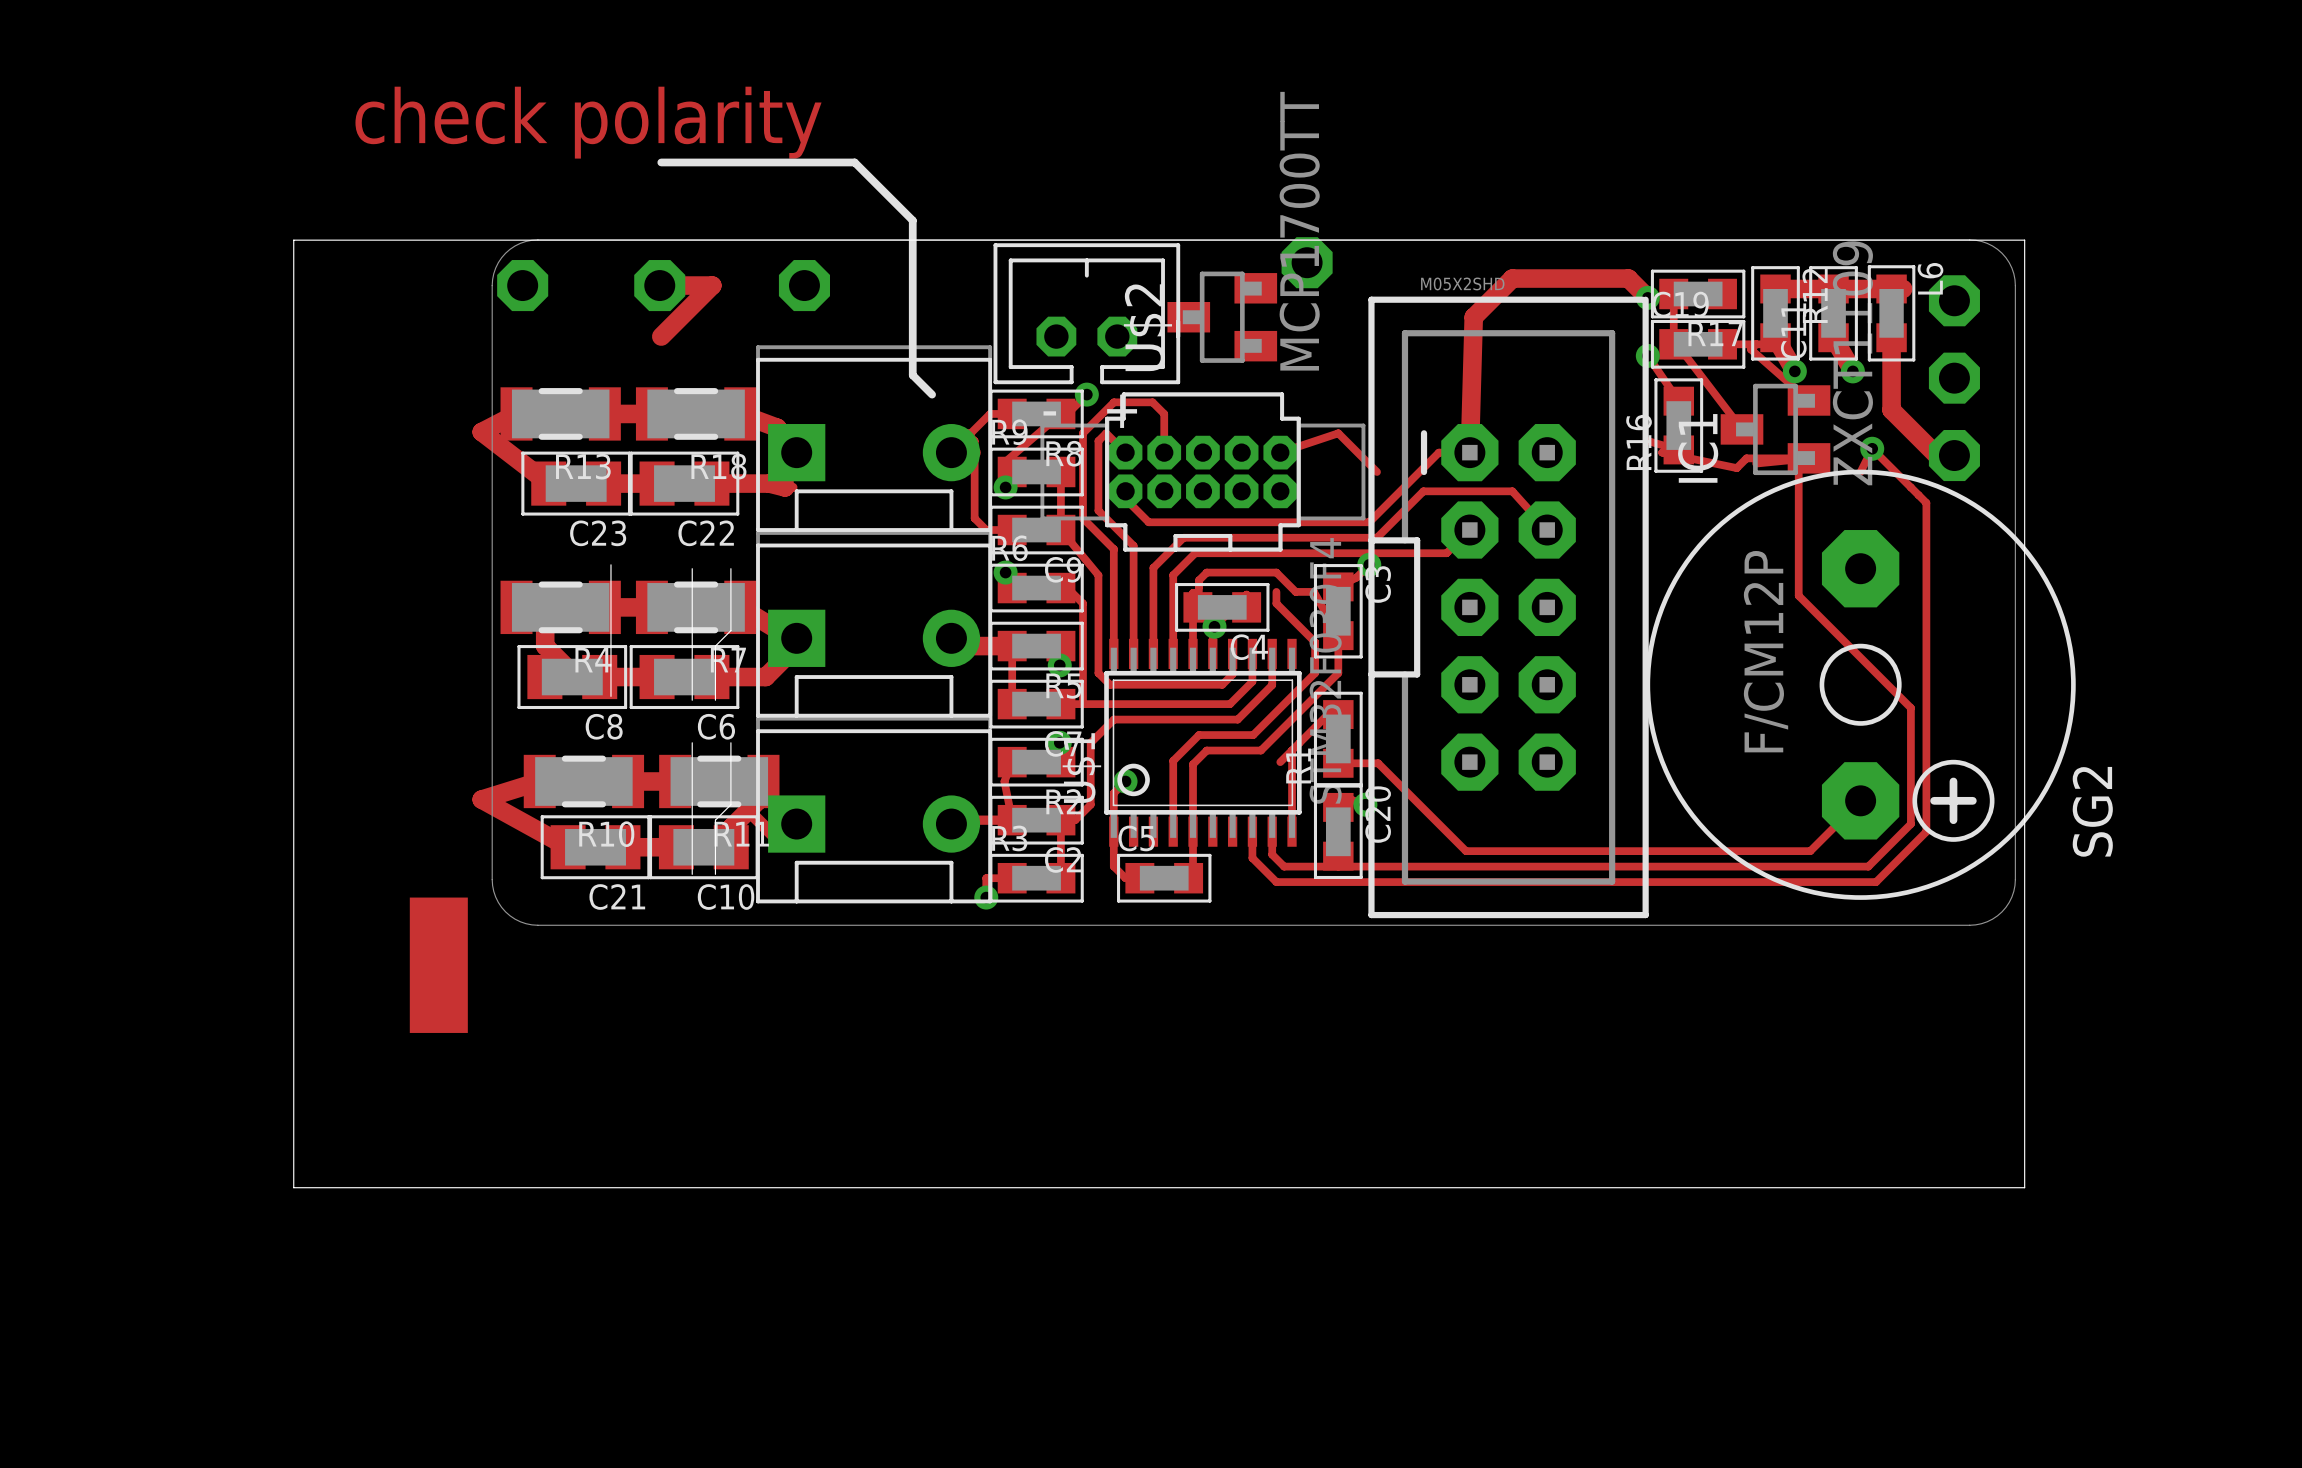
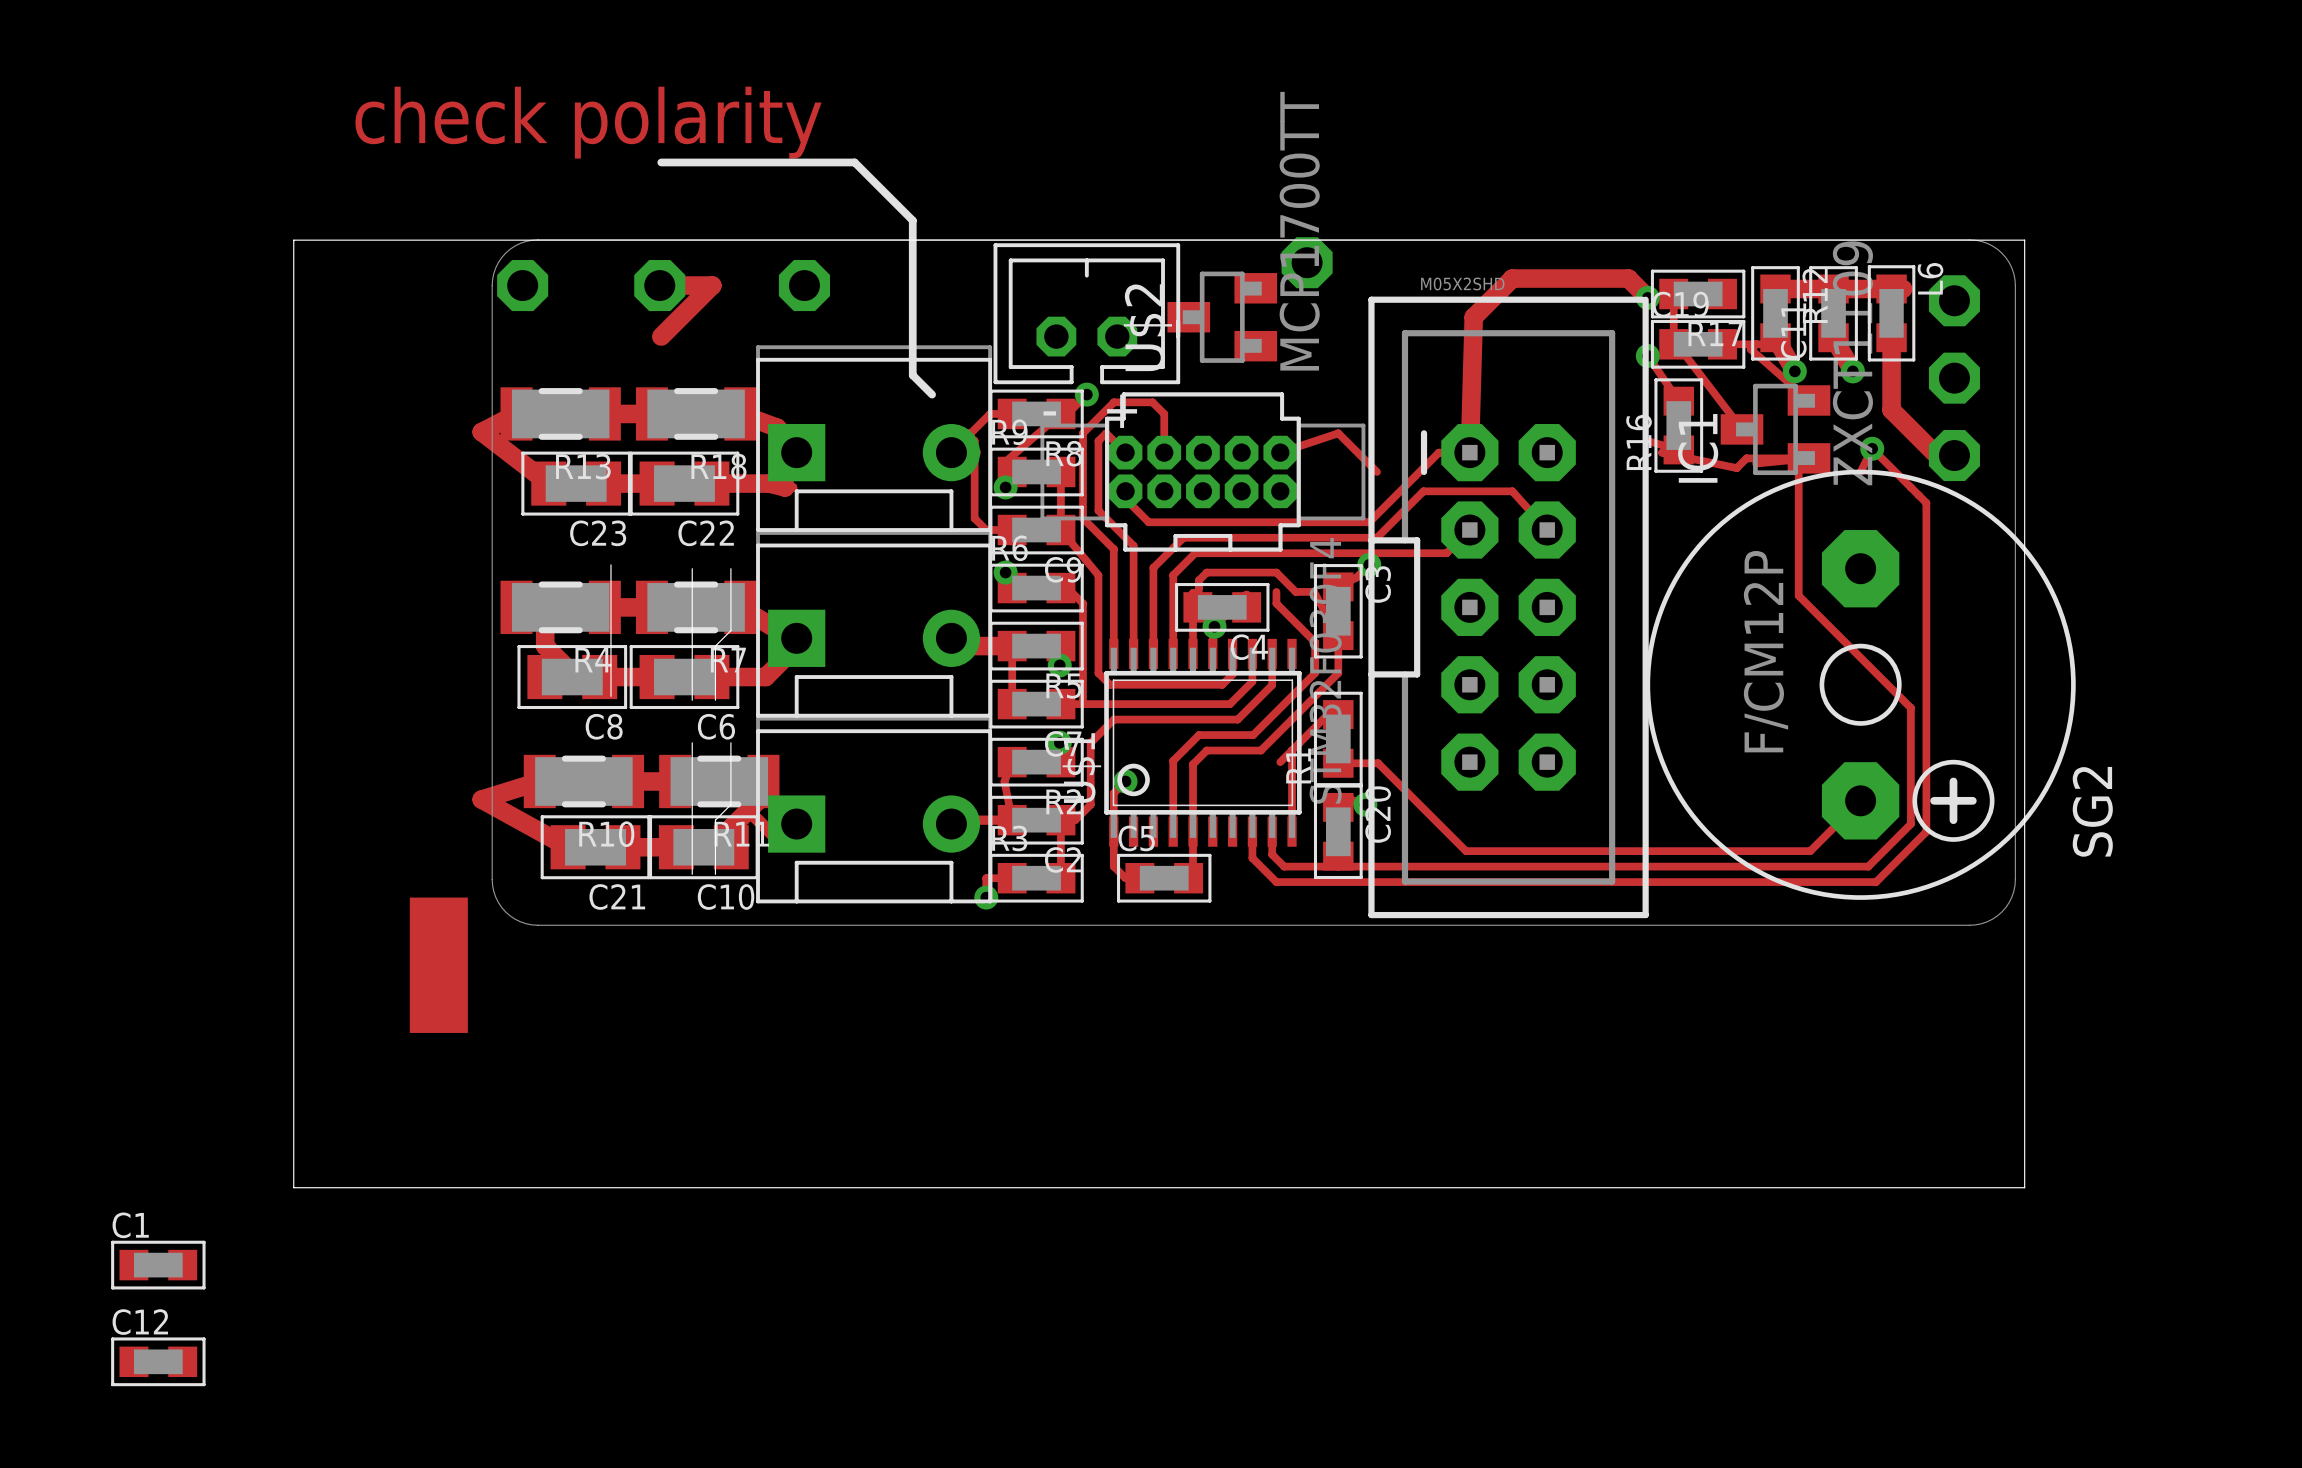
C1: none -> (158, 1265)
C12: none -> (158, 1361)

